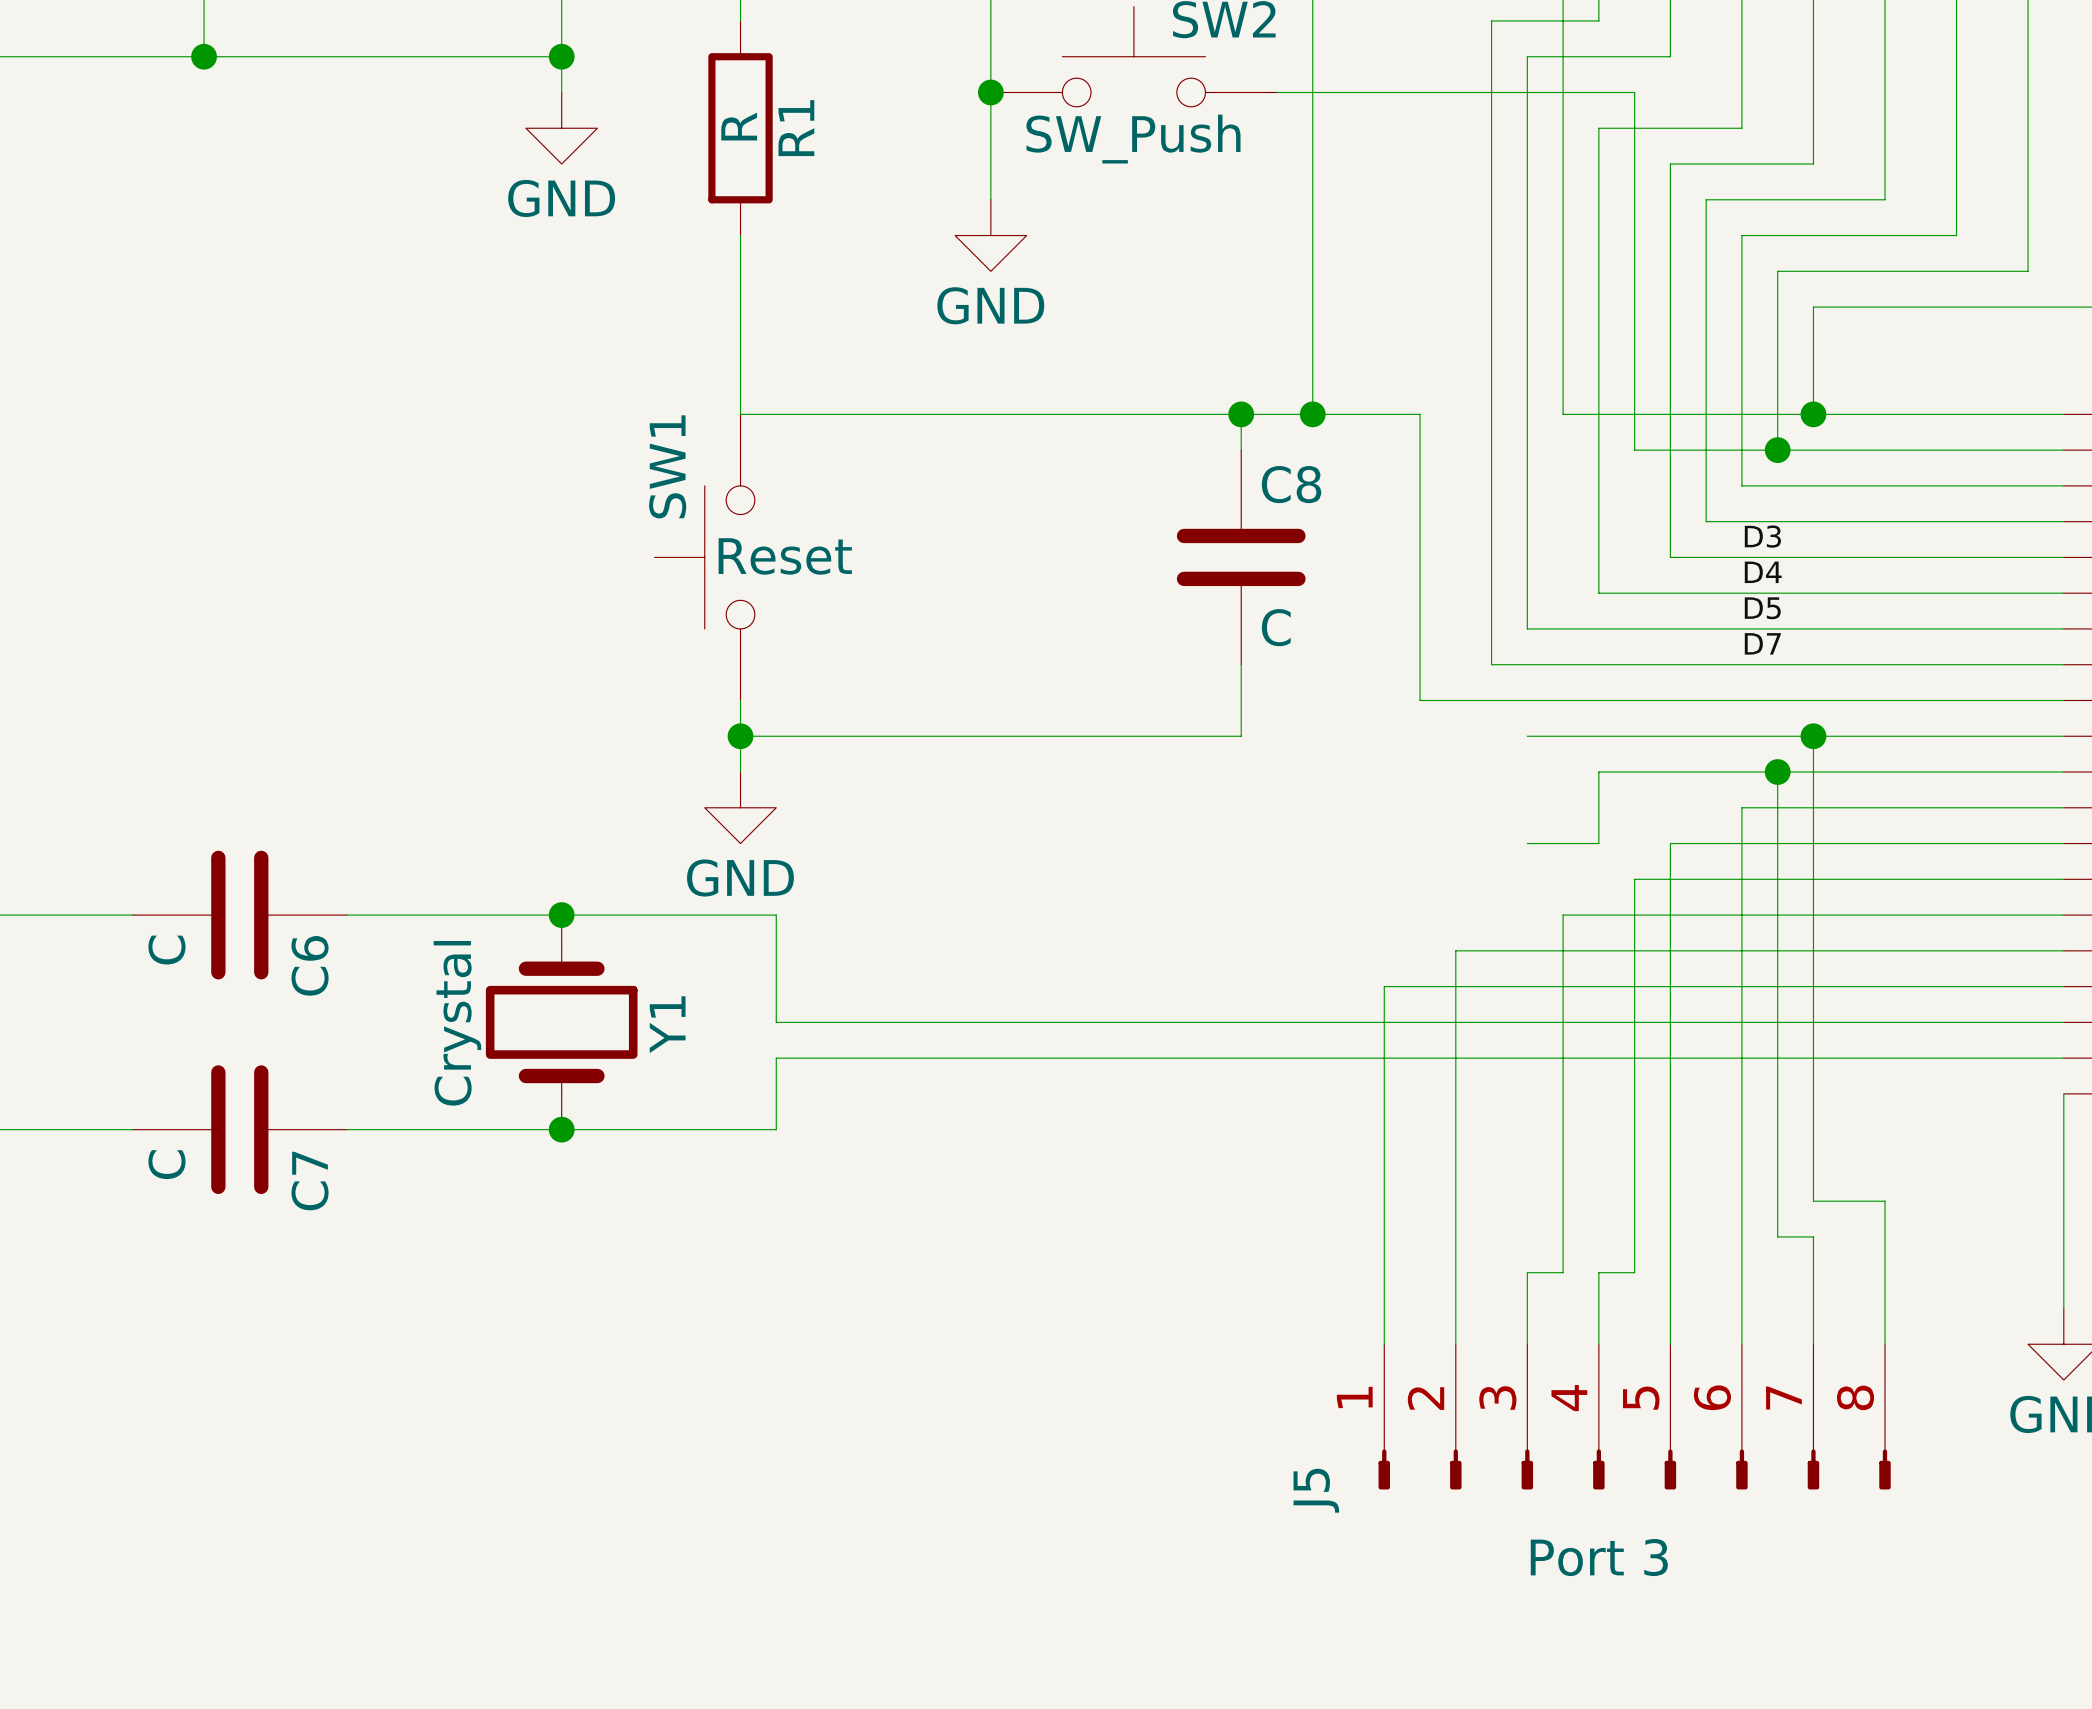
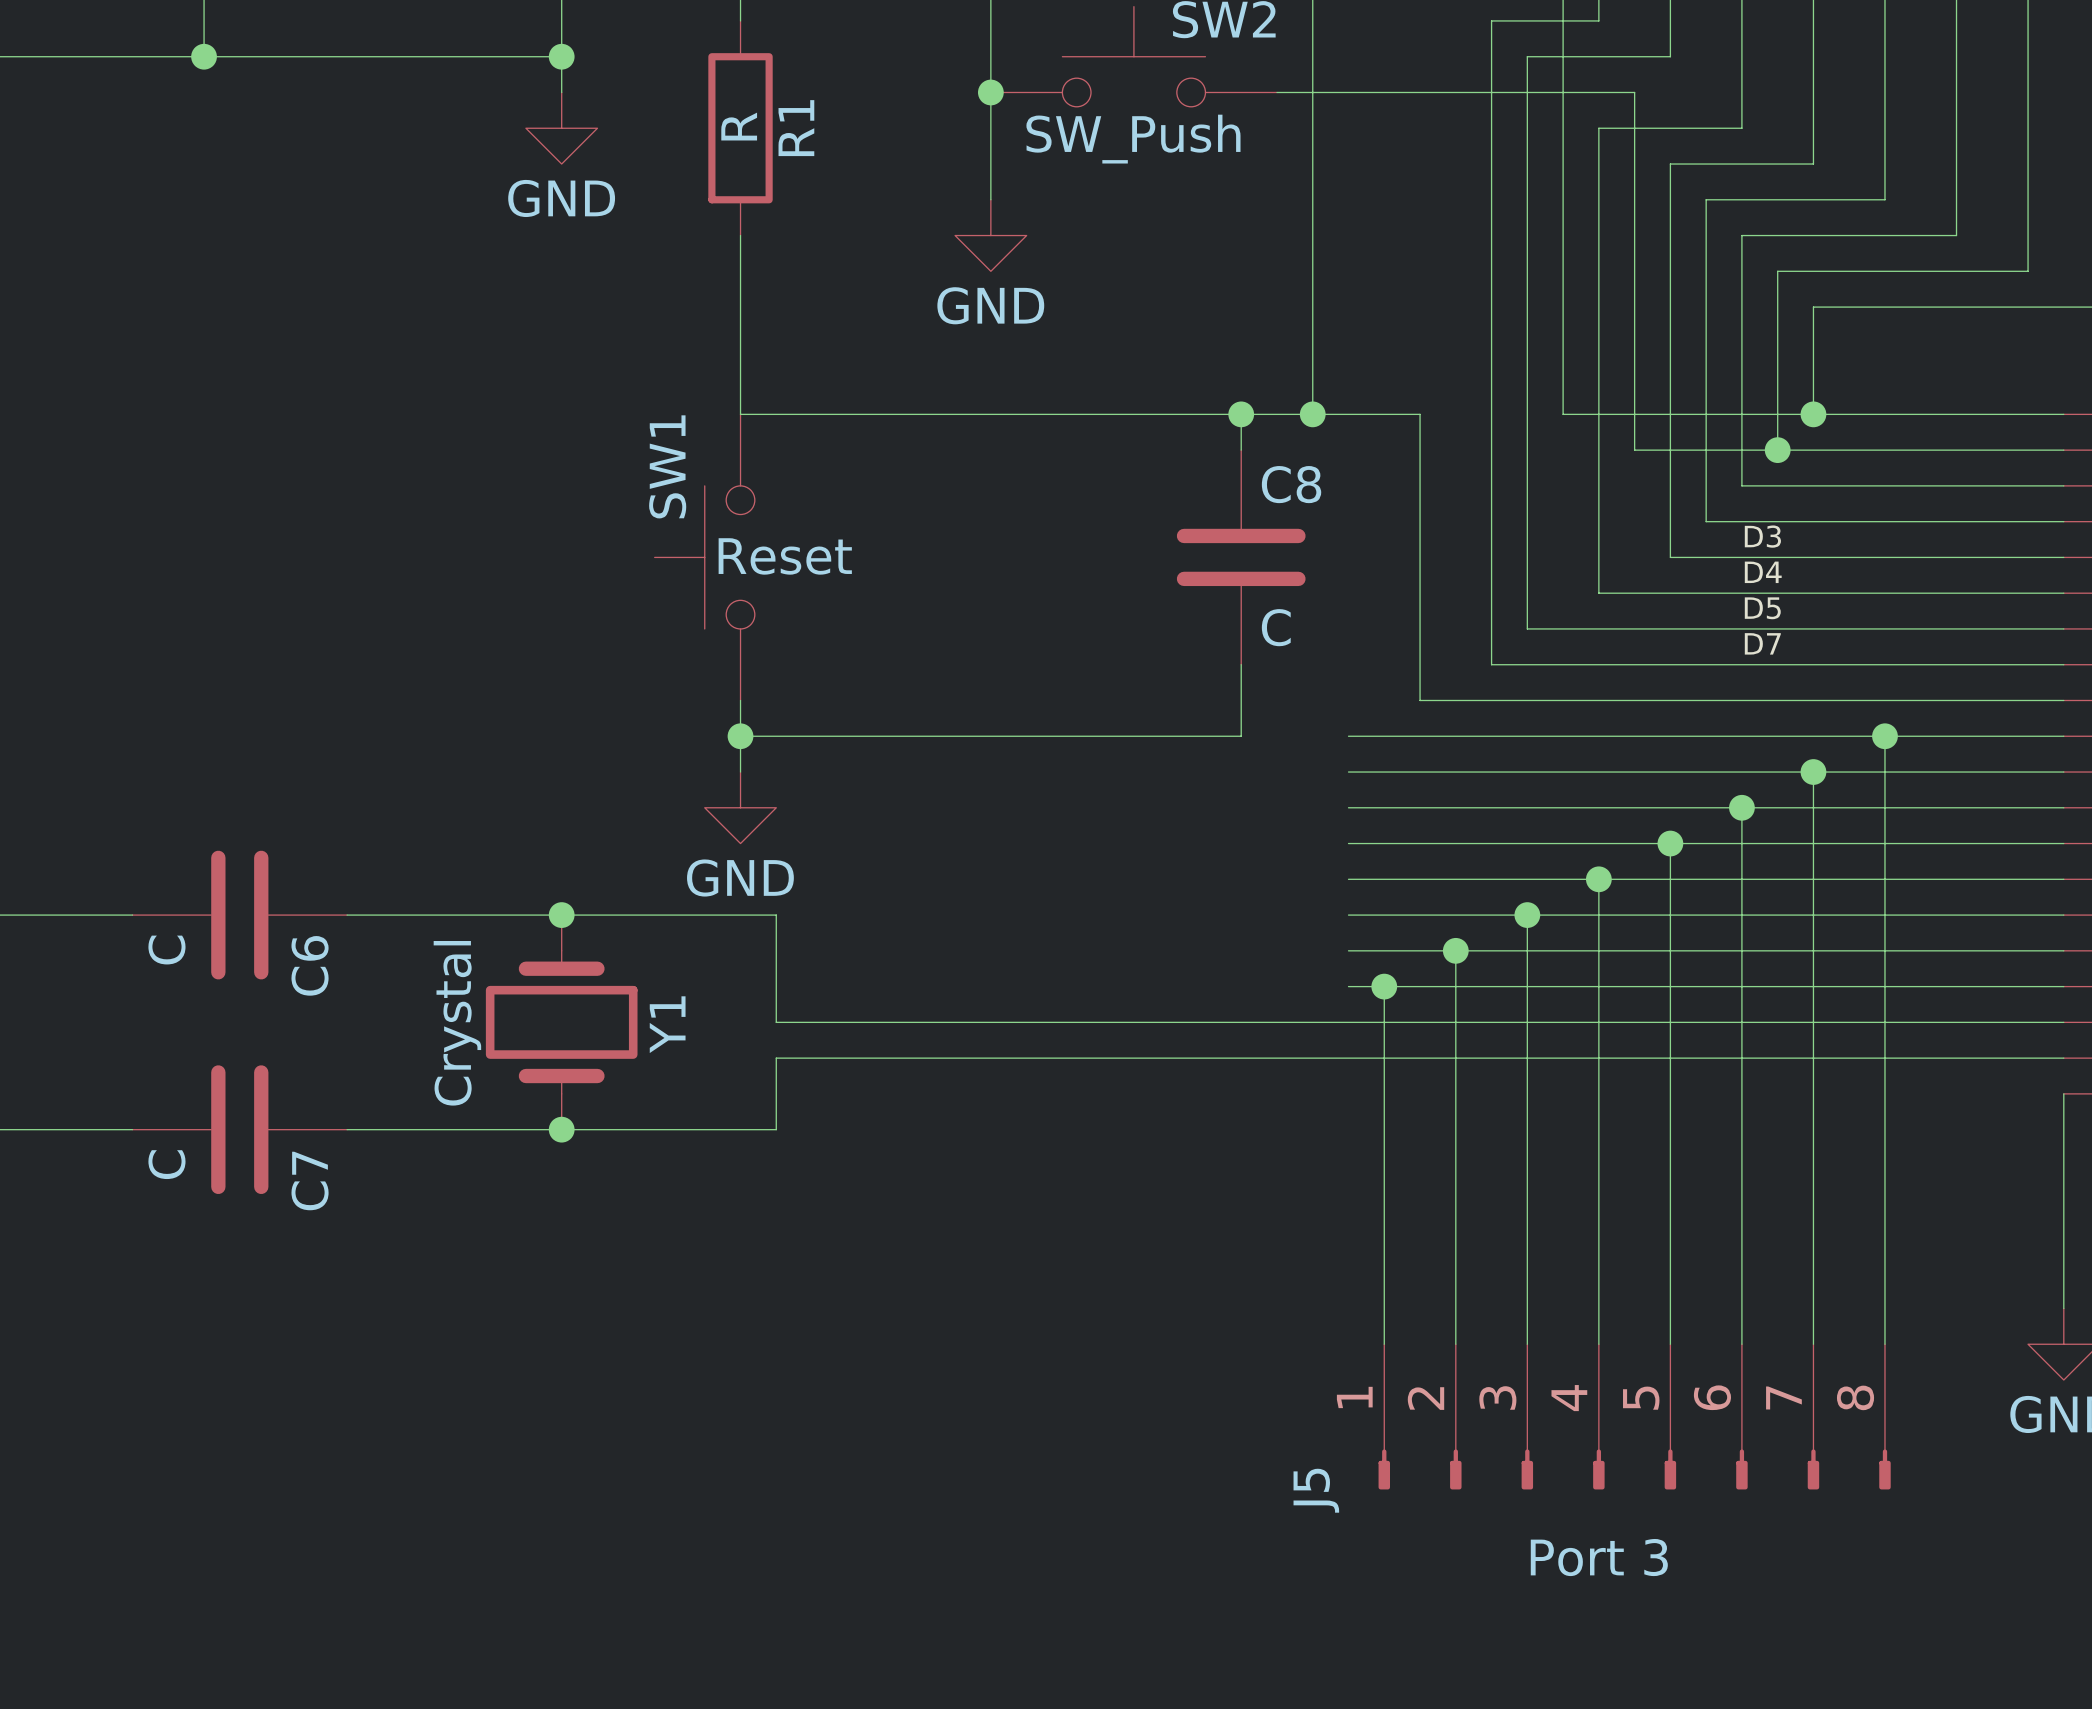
wire: none -> (1348, 736) (1527, 736)
wire: (1813, 736) (1813, 772) -> none
junction: (1813, 736) -> none
wire: none -> (1884, 736) (1884, 1201)
junction: none -> (1884, 736)
wire: none -> (1348, 772) (1598, 772)
wire: (1598, 772) (1598, 843) -> (1670, 843) (1598, 843)
wire: (1777, 772) (1777, 1236) (1813, 1236) -> none
junction: (1777, 772) -> none
junction: none -> (1813, 772)
wire: none -> (1348, 807) (1741, 807)
junction: none -> (1741, 807)
wire: none -> (1348, 843) (1527, 843)
junction: none -> (1670, 843)
wire: none -> (1348, 879) (1634, 879)
junction: none -> (1598, 879)
wire: (1634, 879) (1634, 1272) (1598, 1272) -> (1598, 879) (1598, 1272)
wire: none -> (1348, 915) (1563, 915)
junction: none -> (1527, 915)
wire: (1563, 915) (1563, 1272) (1527, 1272) -> (1527, 915) (1527, 1272)
wire: none -> (1348, 950) (1455, 950)
junction: none -> (1455, 950)
wire: none -> (1348, 986) (1384, 986)
junction: none -> (1384, 986)
wire: (1813, 1201) (1884, 1201) -> (1813, 1201) (1813, 1236)

